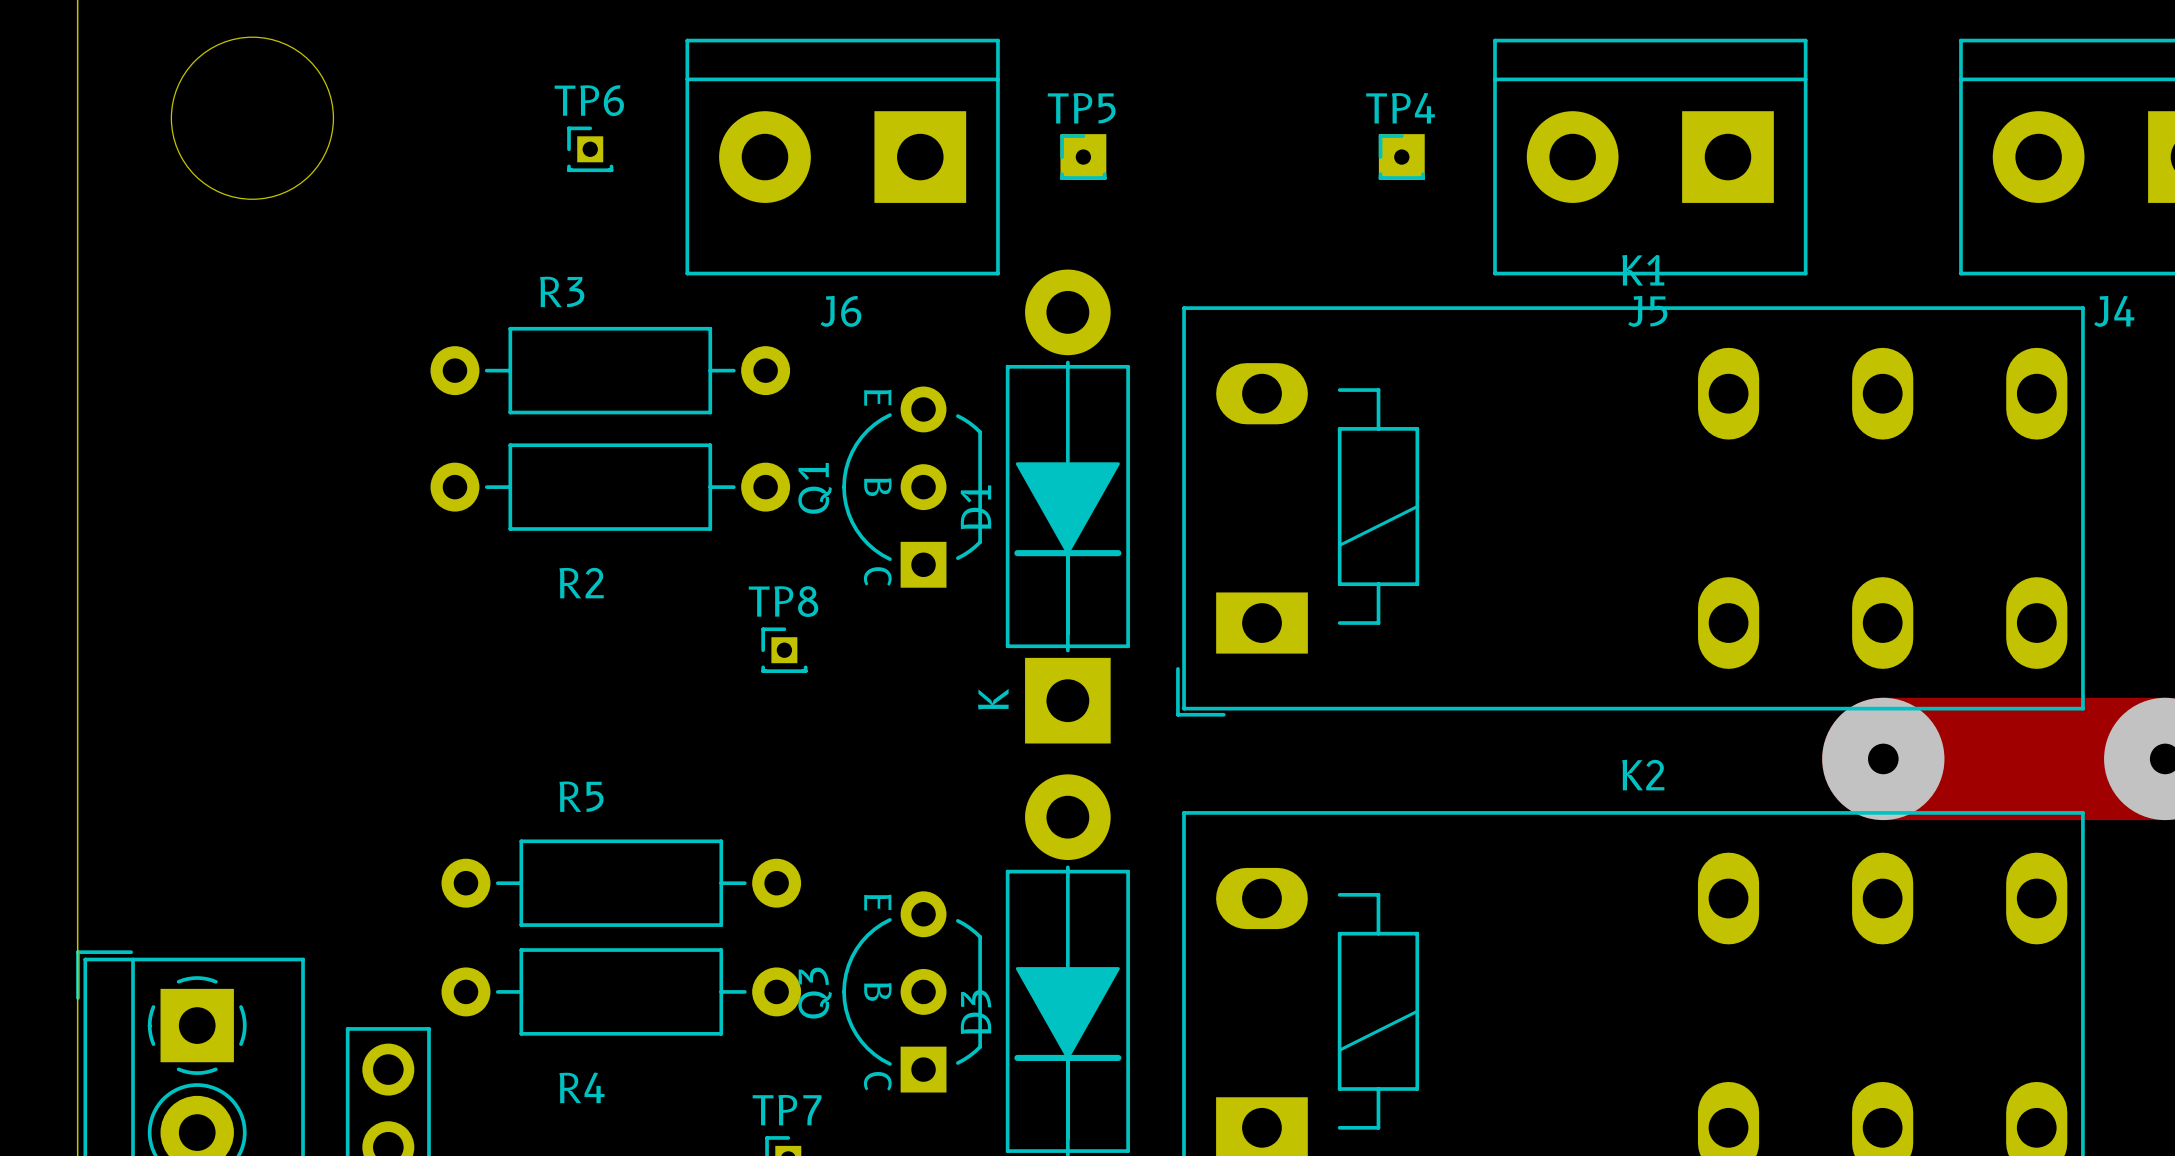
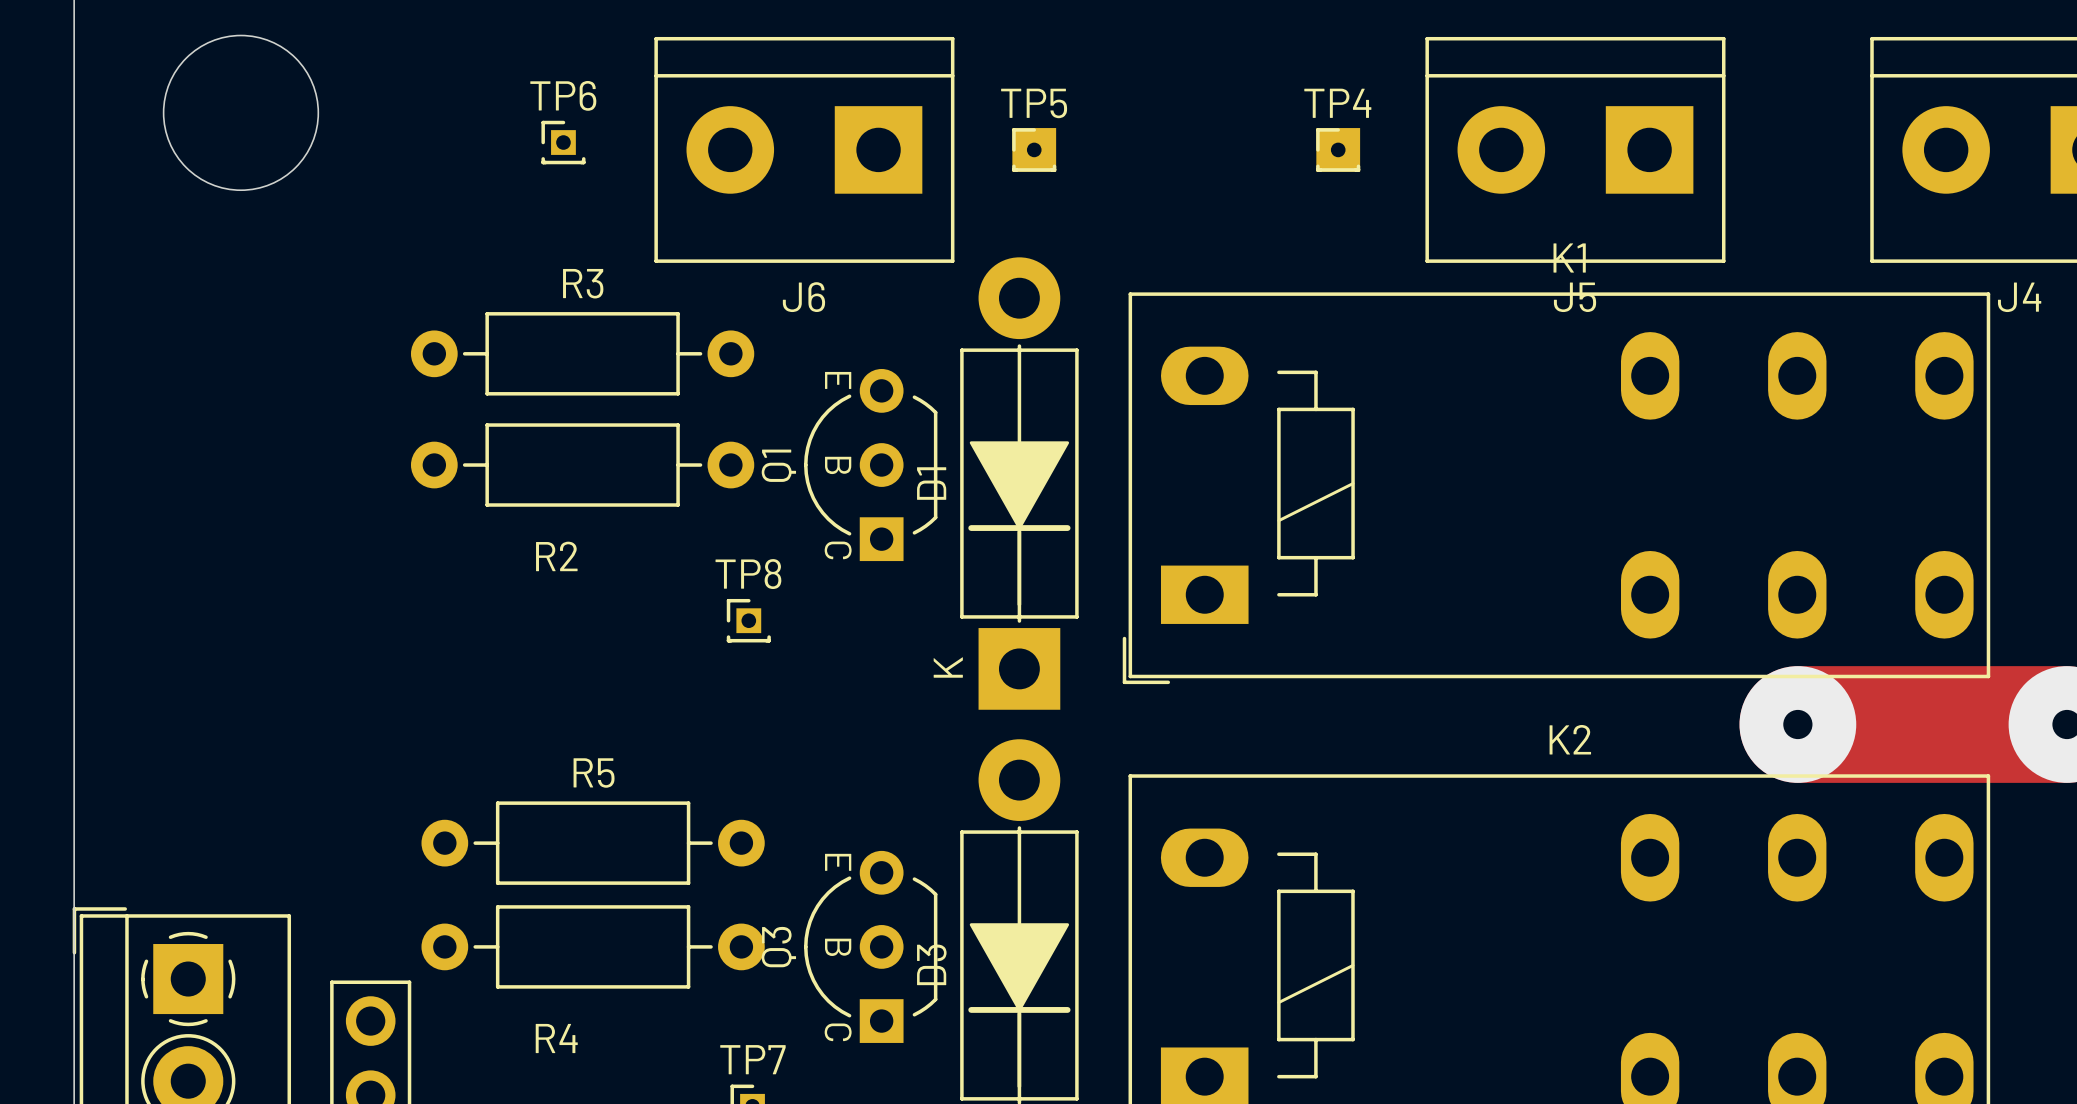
R3 name position: R3 (562, 291) -> R3 (583, 283)
R5 name position: R5 (581, 796) -> R5 (594, 773)

